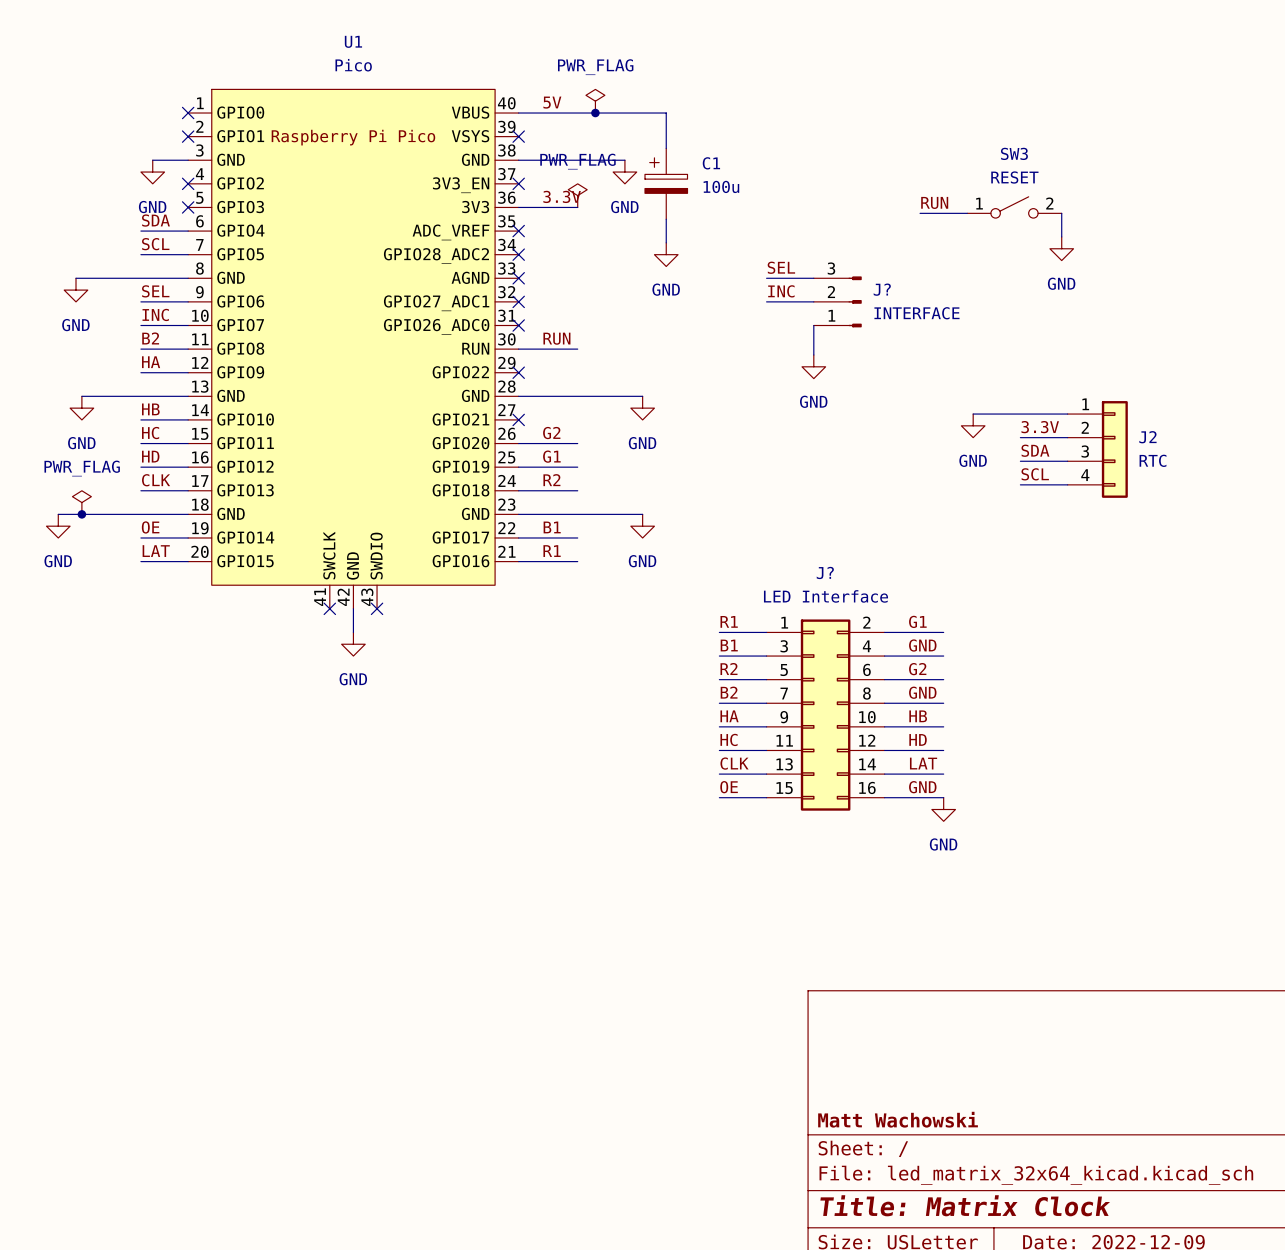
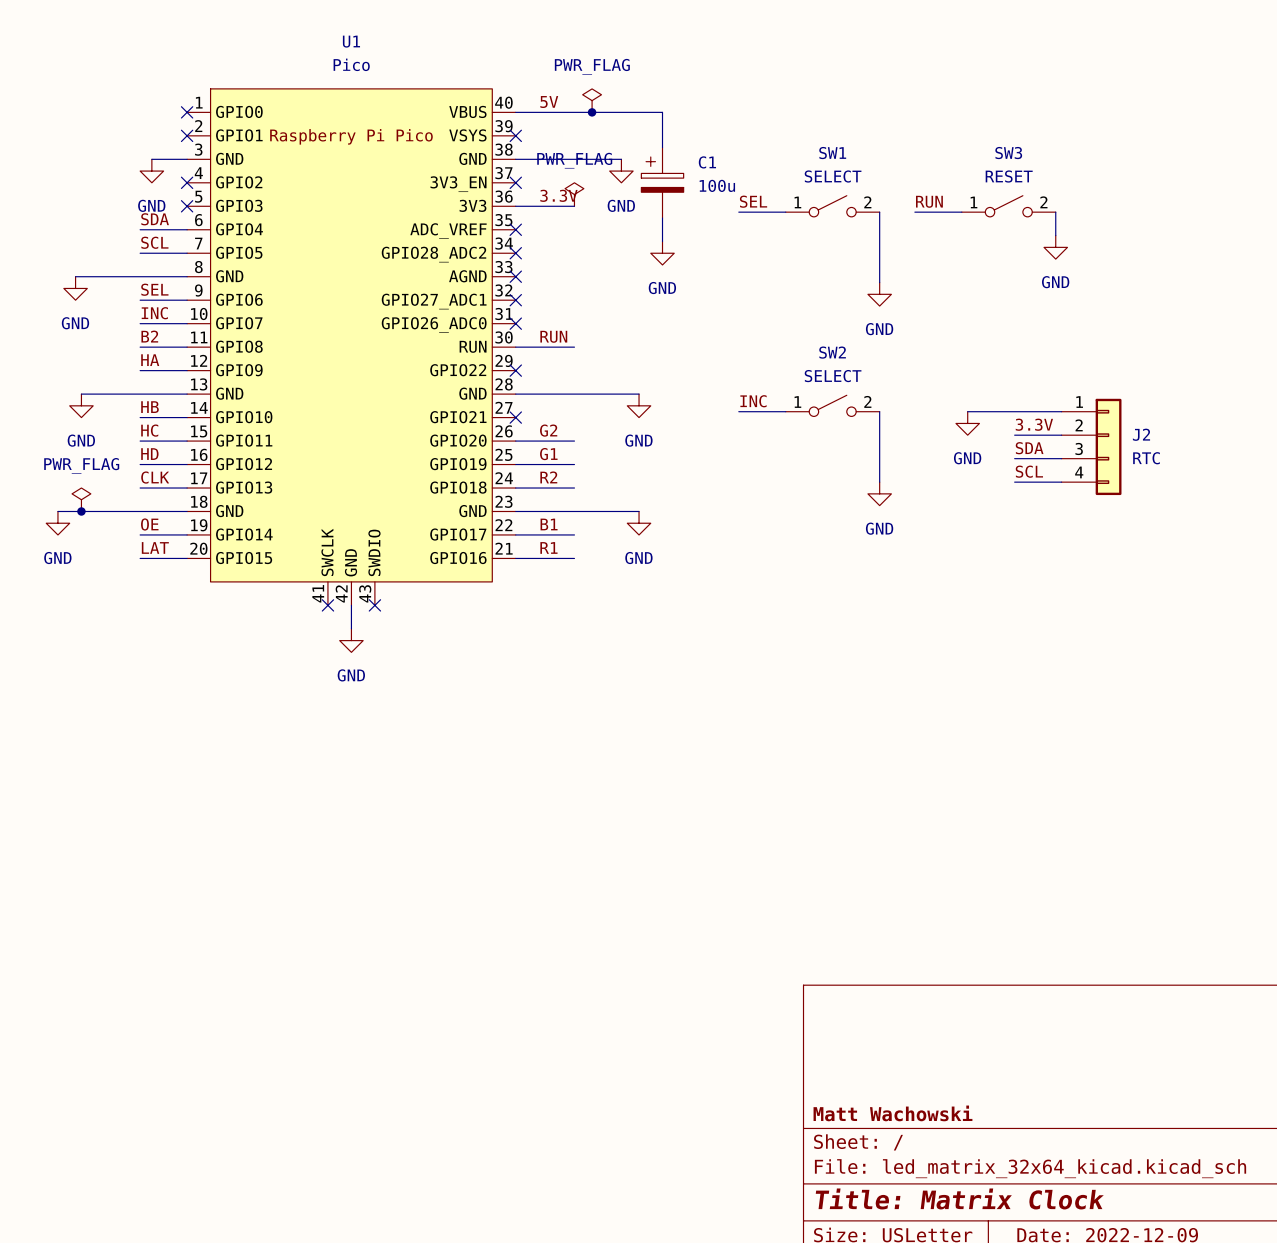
SW1: none -> SELECT (832, 206)
wire: none -> (879, 212) (879, 282)
label position: SEL (781, 267) -> SEL (753, 201)
wire: (766, 278) (813, 278) -> (738, 212) (785, 212)
label position: INC (781, 291) -> INC (753, 401)
power symbol: none -> GND (879, 294)
wire: (766, 301) (813, 301) -> (738, 411) (785, 411)
J?: INTERFACE (837, 301) -> none
wire: (813, 325) (813, 355) -> none
power symbol: GND (813, 366) -> none
SW2: none -> SELECT (832, 405)
wire: none -> (879, 411) (879, 482)
power symbol: none -> GND (879, 493)
label: R1 (729, 621) -> none
label: G1 (917, 621) -> none
wire: (719, 632) (766, 632) -> none
wire: (884, 632) (943, 632) -> none
label: B1 (729, 645) -> none
label: GND (922, 645) -> none
wire: (719, 656) (766, 656) -> none
wire: (884, 656) (943, 656) -> none
label: R2 (729, 669) -> none
label: G2 (917, 669) -> none
wire: (719, 679) (766, 679) -> none
wire: (884, 679) (943, 679) -> none
label: B2 (729, 692) -> none
label: GND (922, 692) -> none
wire: (719, 703) (766, 703) -> none
wire: (884, 703) (943, 703) -> none
J?: LED Interface (825, 715) -> none
label: HA (729, 716) -> none
label: HB (918, 716) -> none
wire: (719, 726) (766, 726) -> none
wire: (884, 726) (943, 726) -> none
label: HC (729, 739) -> none
label: HD (918, 739) -> none
wire: (719, 750) (766, 750) -> none
wire: (884, 750) (943, 750) -> none
label: CLK (734, 763) -> none
label: LAT (923, 763) -> none
wire: (719, 774) (766, 774) -> none
wire: (884, 774) (943, 774) -> none
label: OE (729, 787) -> none
label: GND (922, 787) -> none
wire: (719, 797) (766, 797) -> none
wire: (884, 797) (943, 797) -> none
power symbol: GND (943, 809) -> none

